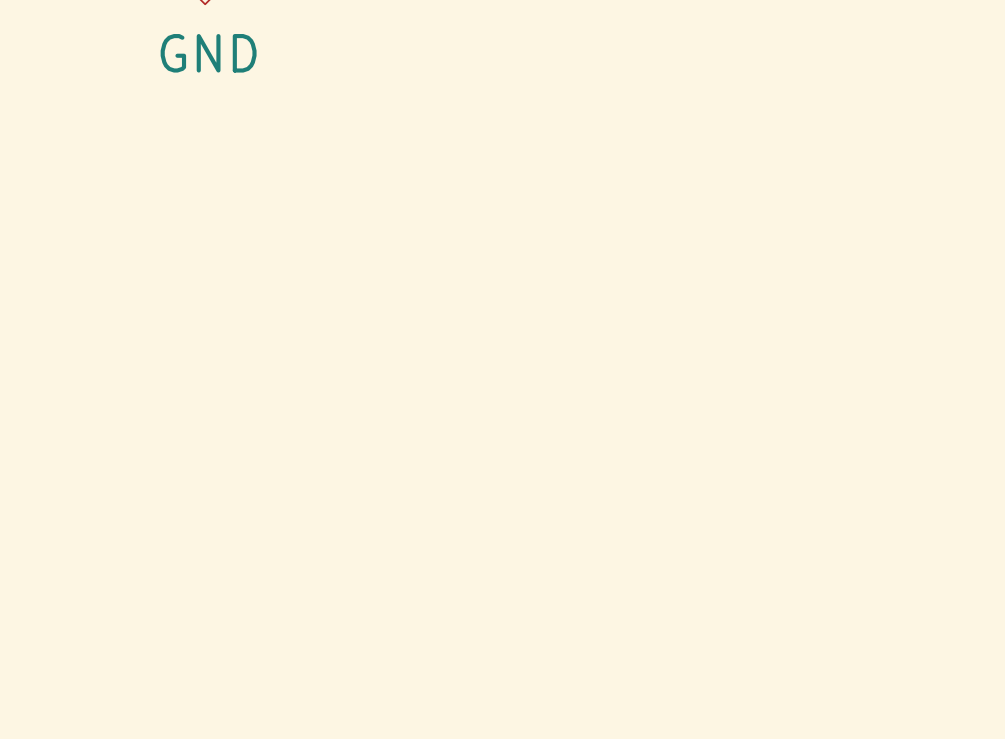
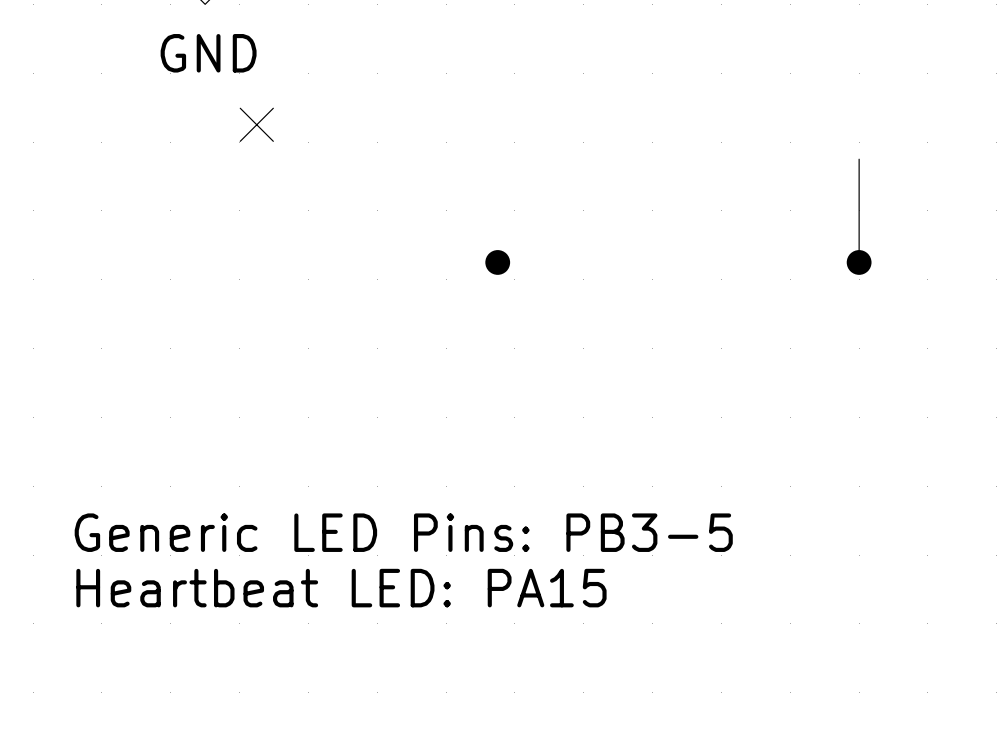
no-connect mark: none -> (256, 124)
wire: none -> (859, 159) (859, 262)
junction: none -> (497, 262)
junction: none -> (859, 262)
text: none -> Generic LED Pins: PB3-5 (403, 532)
text: none -> Heartbeat LED: PA15 (341, 588)

